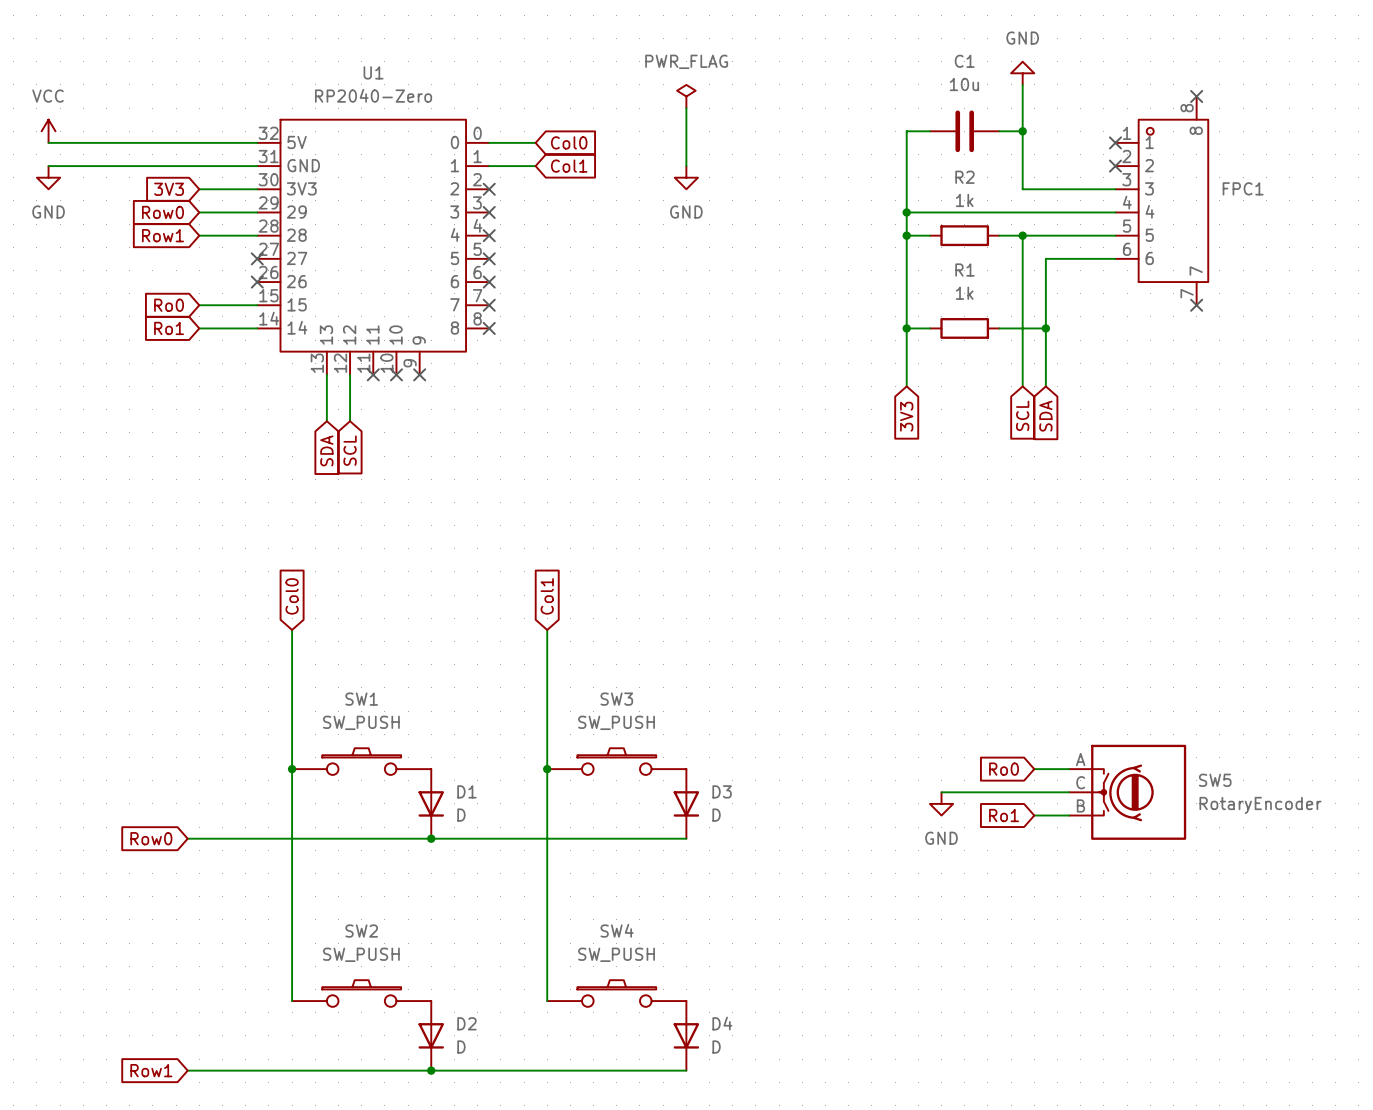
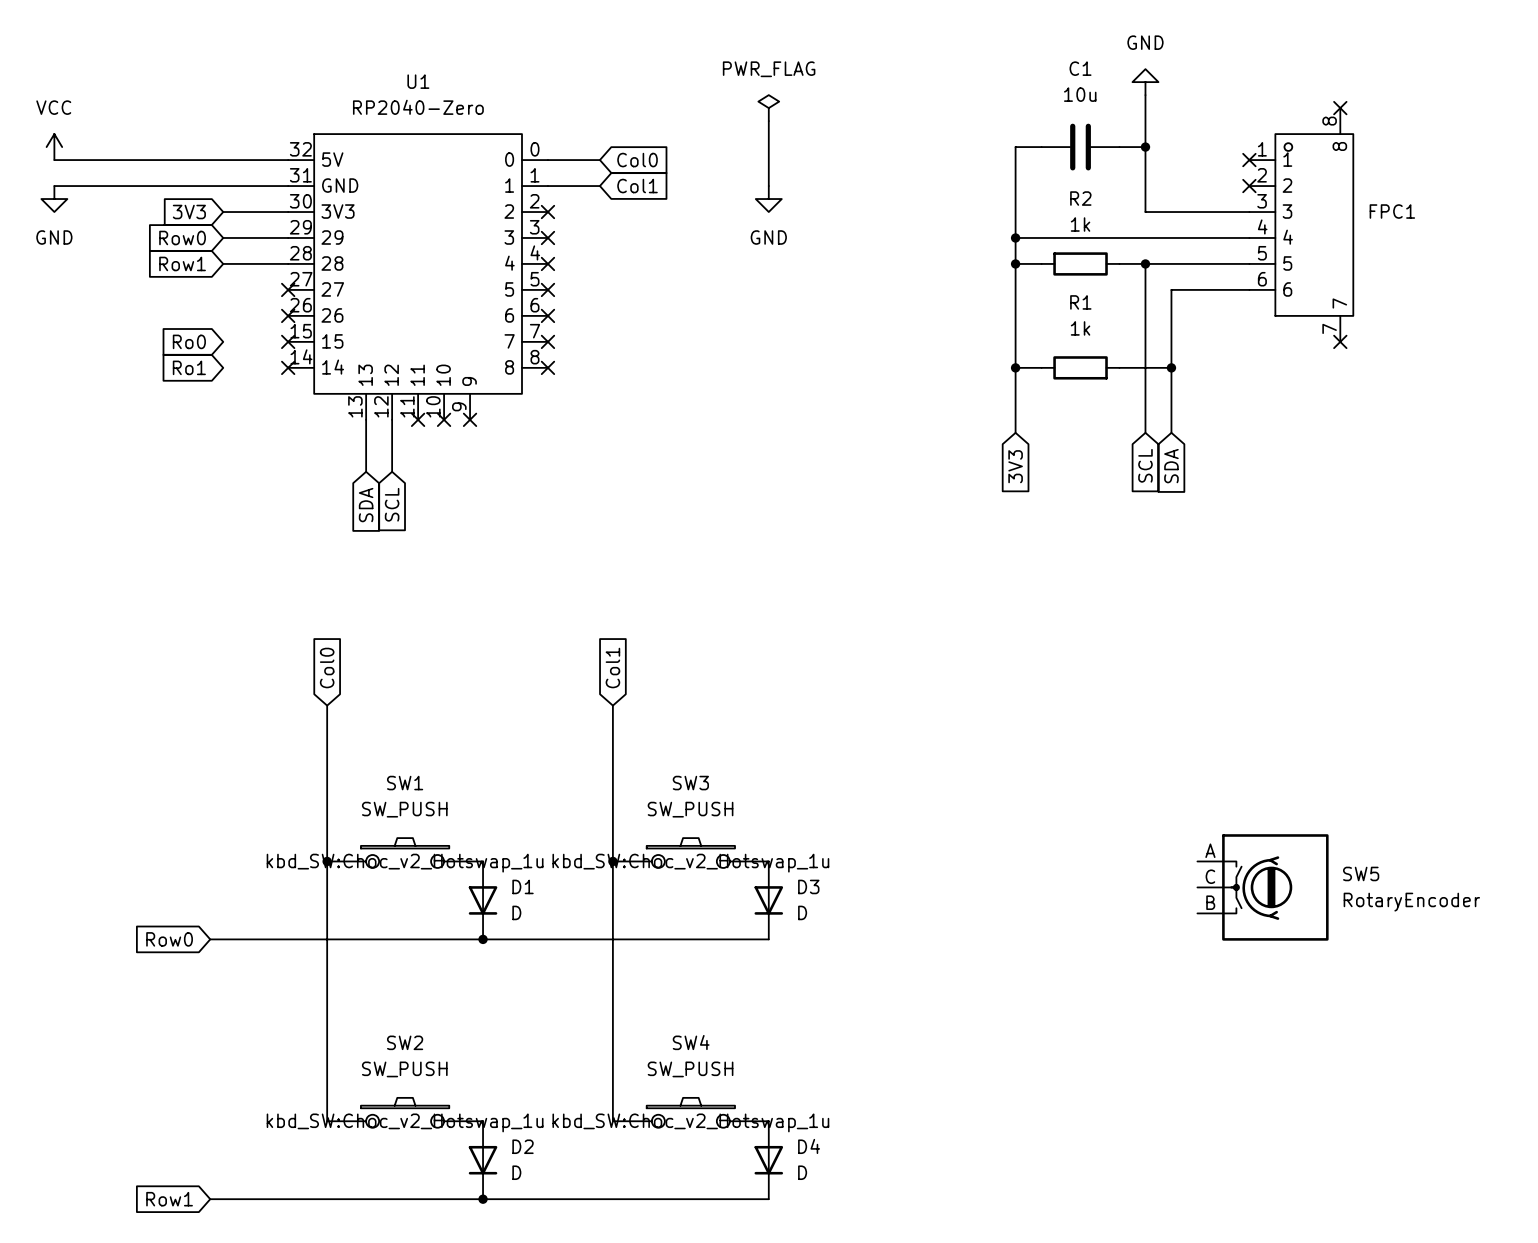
wire: (199, 305) (257, 305) -> none
no-connect mark: none -> (288, 341)
wire: (199, 328) (257, 328) -> none
no-connect mark: none -> (288, 367)
global label: Ro0 (1004, 769) -> none
wire: (1034, 769) (1069, 769) -> none
SW1 text: none -> kbd_SW:Choc_v2_Hotswap_1u (405, 863)
SW3 text: none -> kbd_SW:Choc_v2_Hotswap_1u (690, 863)
wire: (941, 792) (1069, 792) -> none
power symbol: GND (941, 803) -> none
global label: Ro1 (1004, 815) -> none
wire: (1034, 815) (1069, 815) -> none
SW2 text: none -> kbd_SW:Choc_v2_Hotswap_1u (405, 1122)
SW4 text: none -> kbd_SW:Choc_v2_Hotswap_1u (690, 1122)

